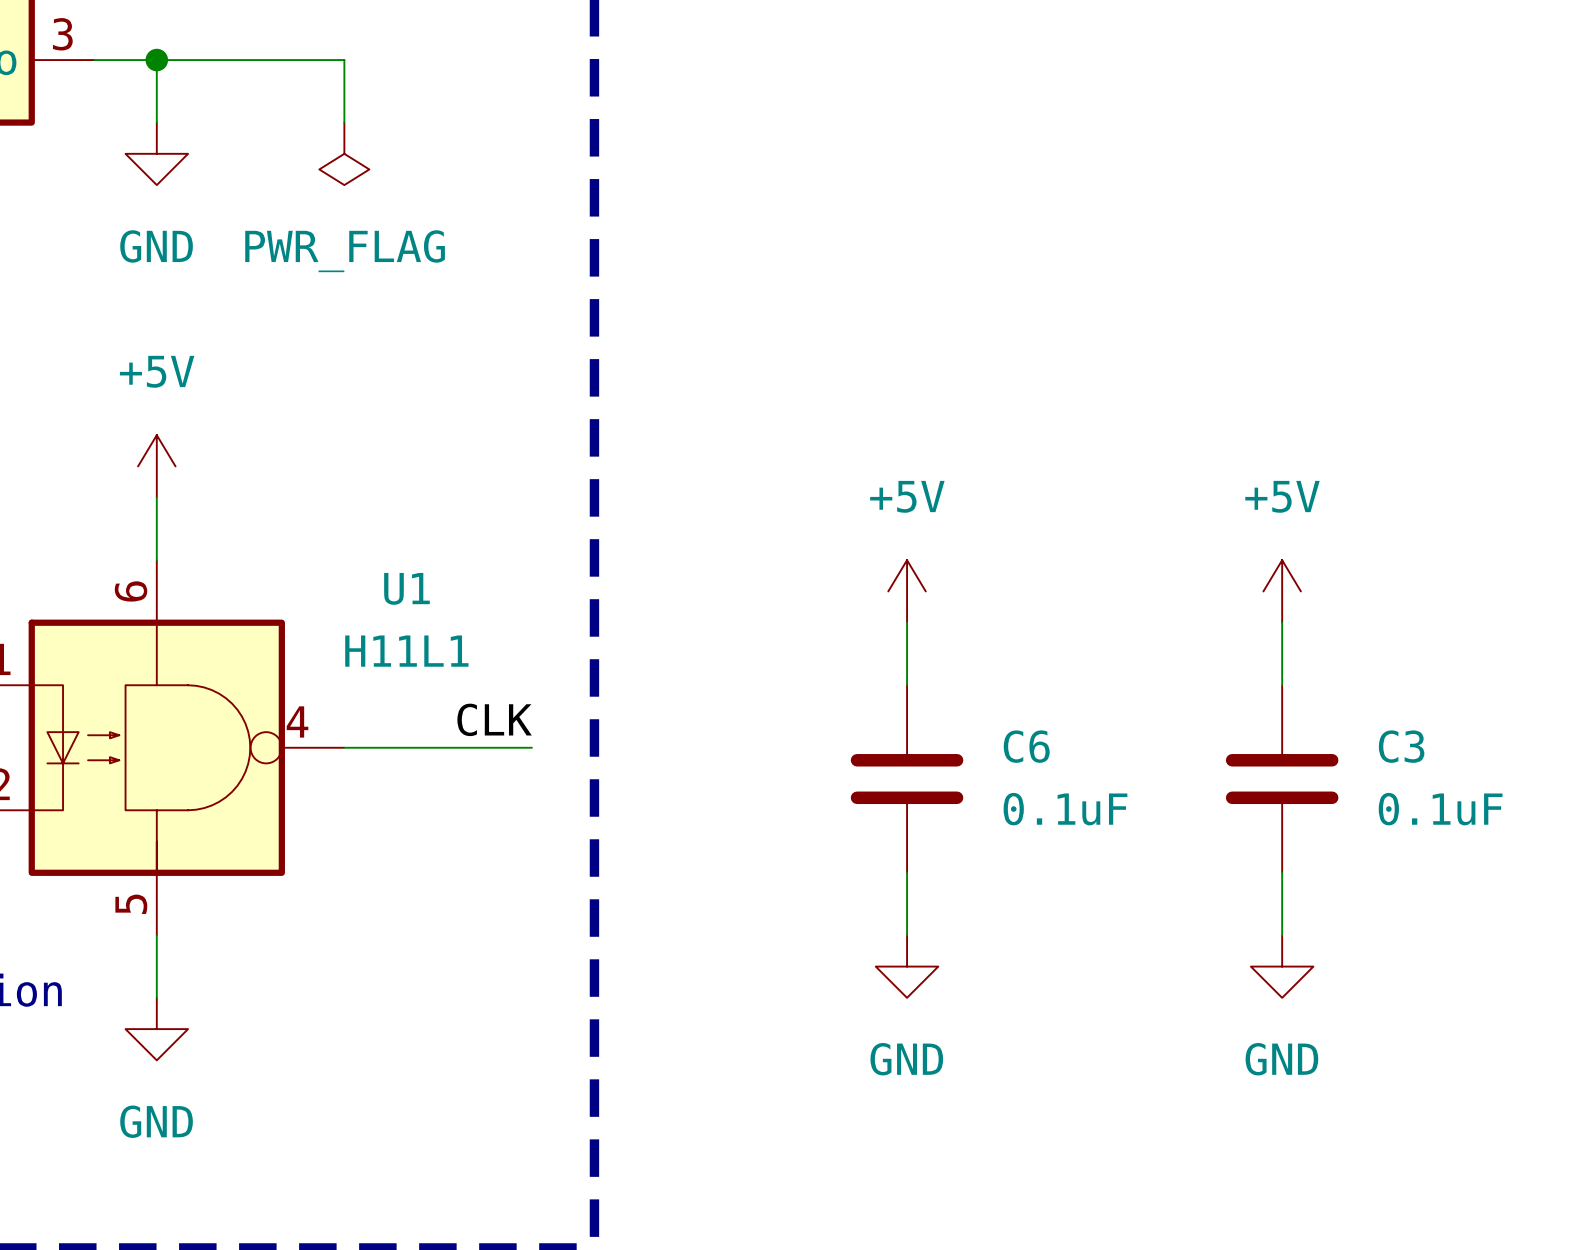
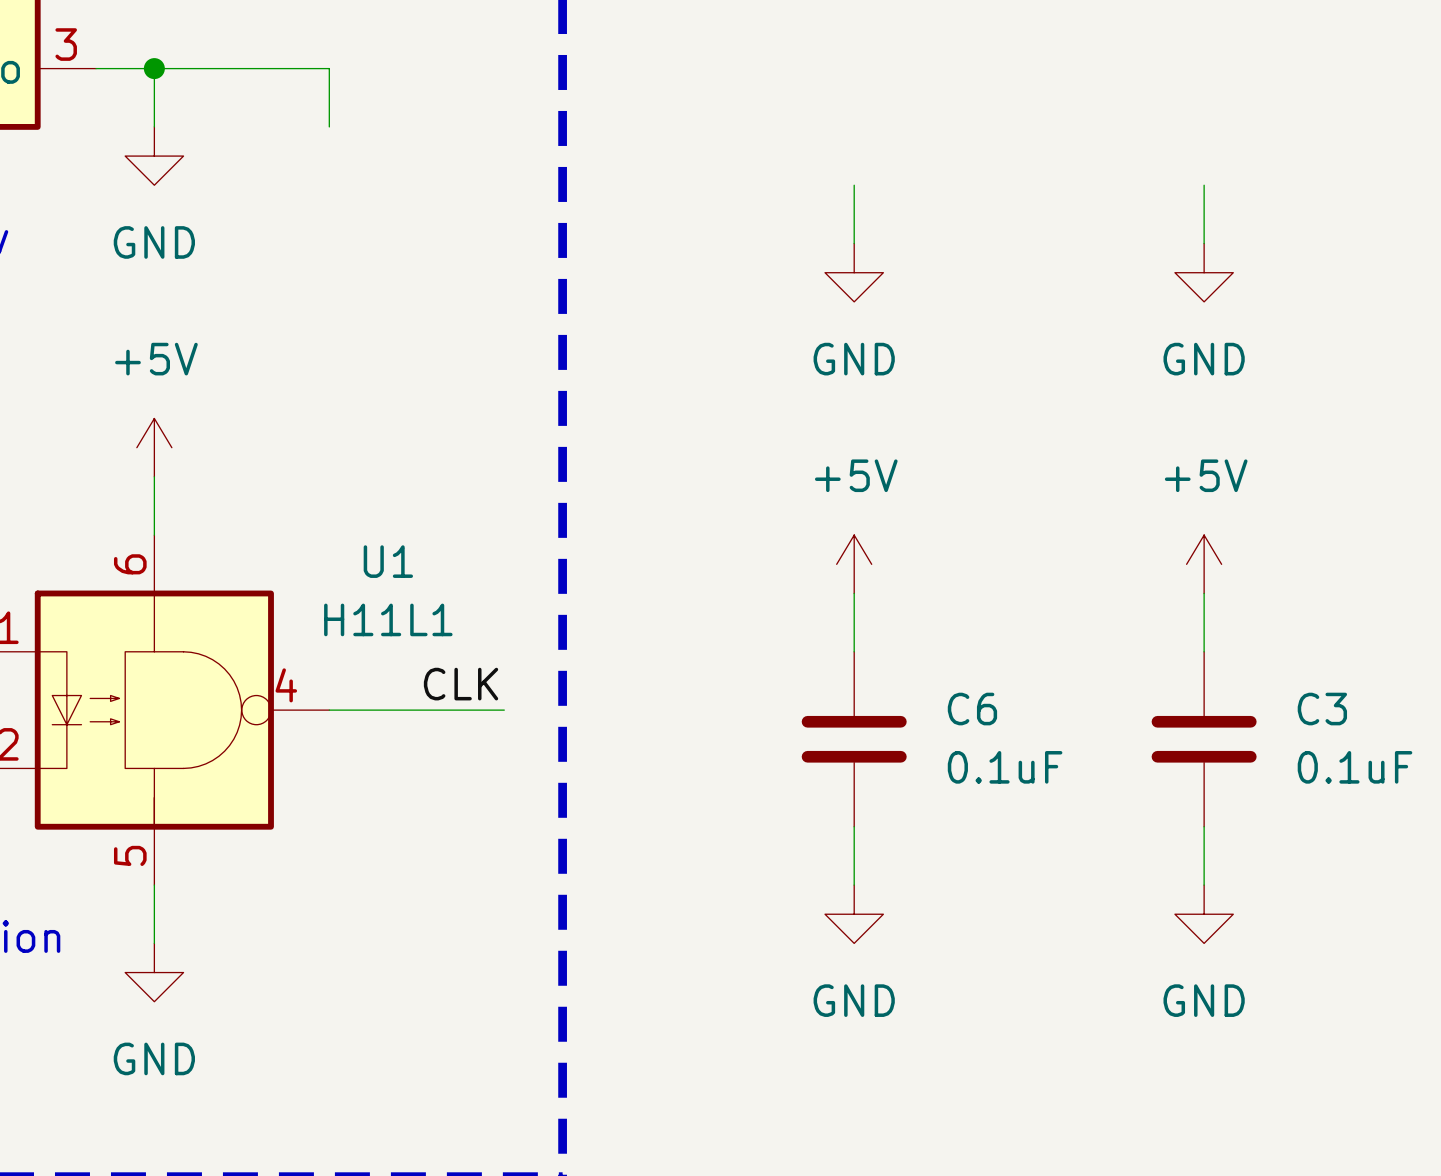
power symbol: PWR_FLAG (344, 153) -> none
wire: none -> (854, 185) (854, 243)
wire: none -> (1204, 185) (1204, 243)
power symbol: none -> GND (854, 272)
power symbol: none -> GND (1204, 272)

